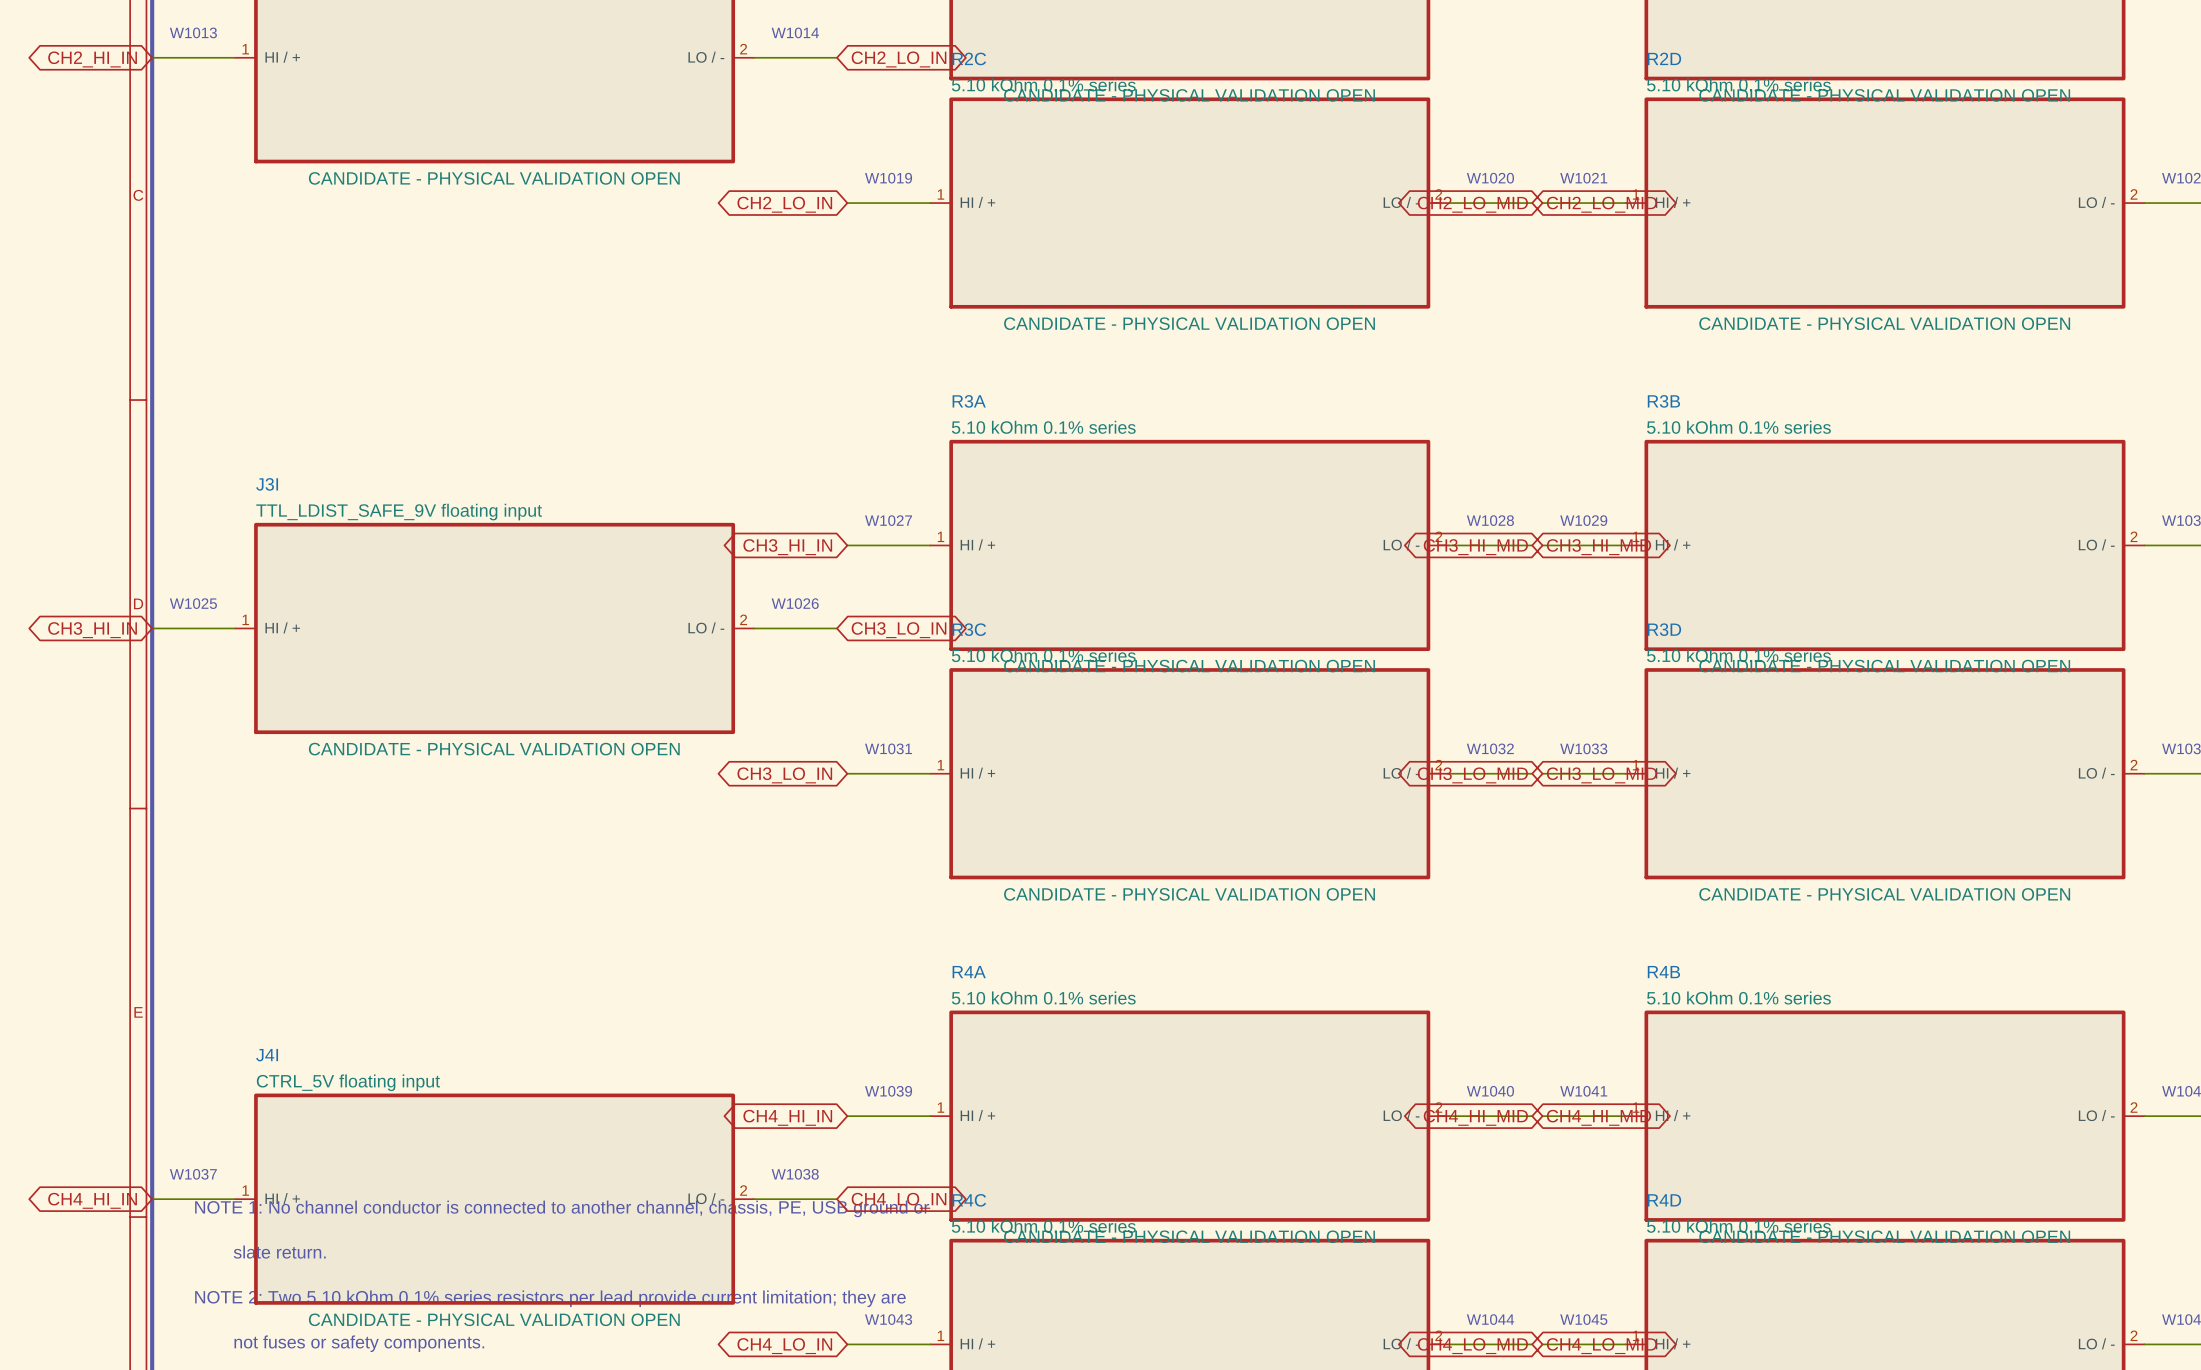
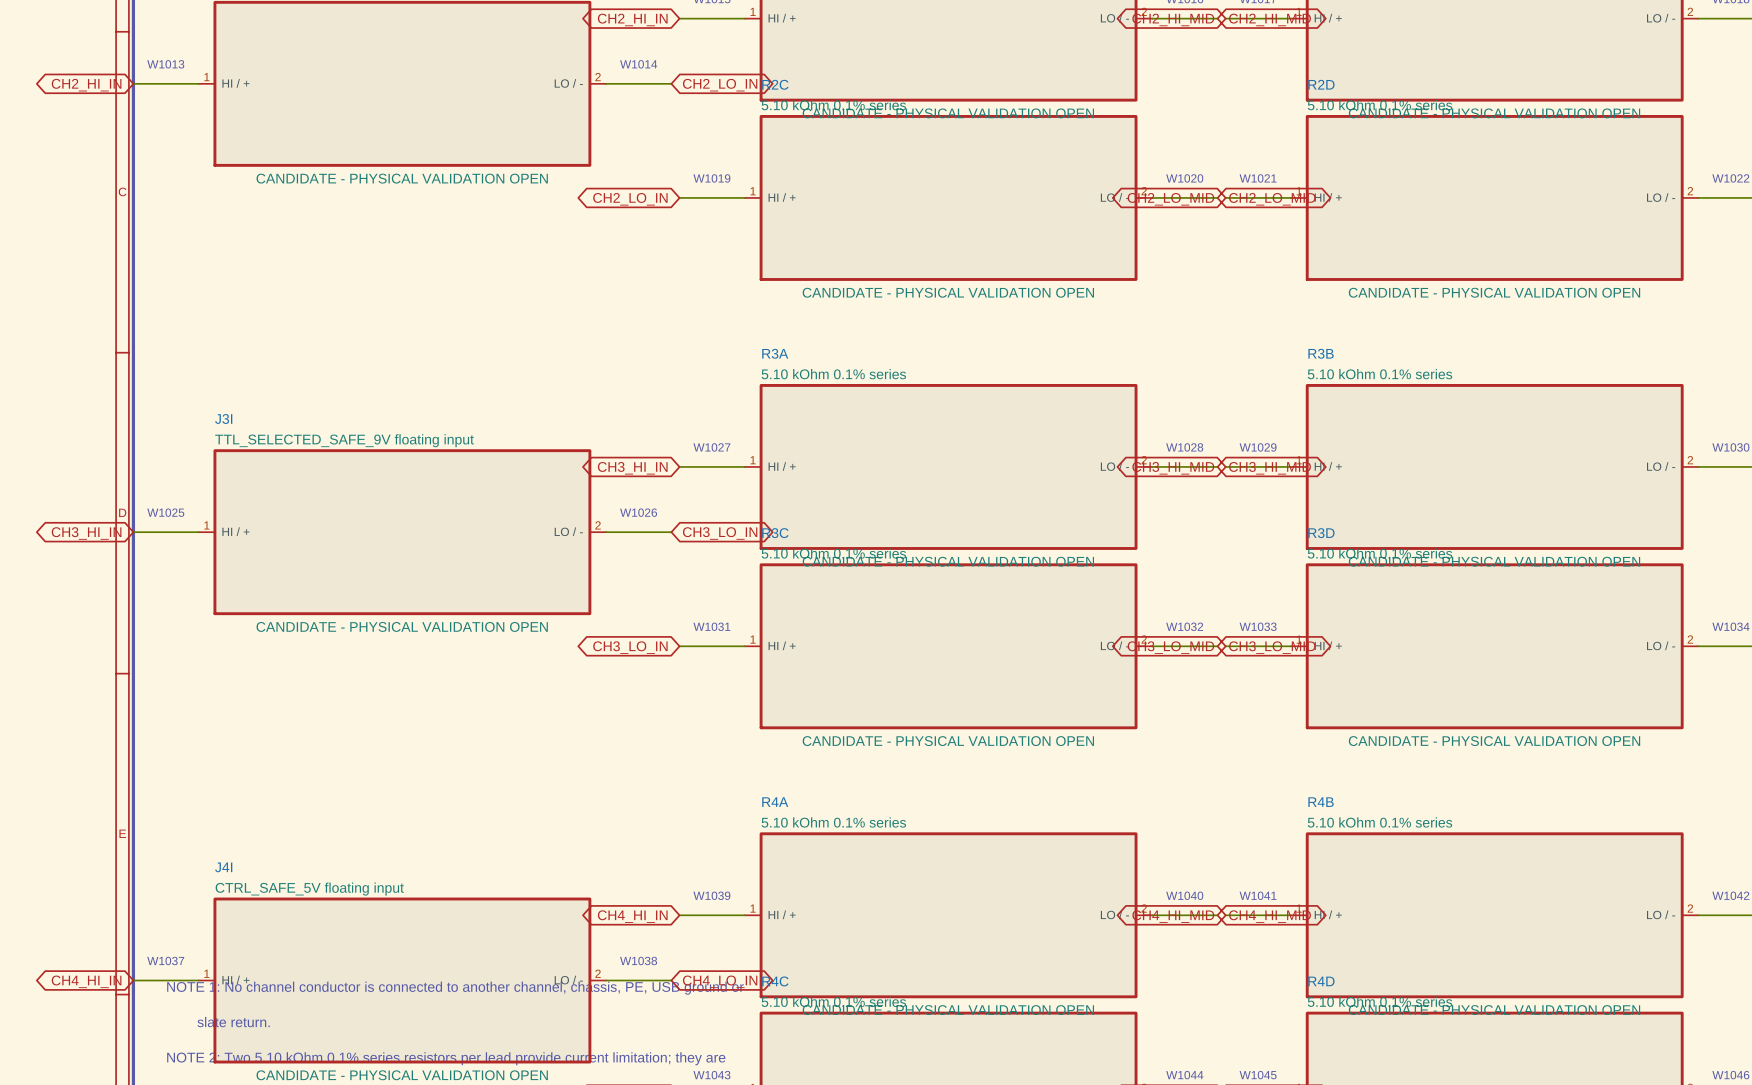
J3I text: TTL_LDIST_SAFE_9V floating input (399, 512) -> TTL_SELECTED_SAFE_9V floating input (344, 440)
J4I text: CTRL_5V floating input (348, 1082) -> CTRL_SAFE_5V floating input (309, 889)

